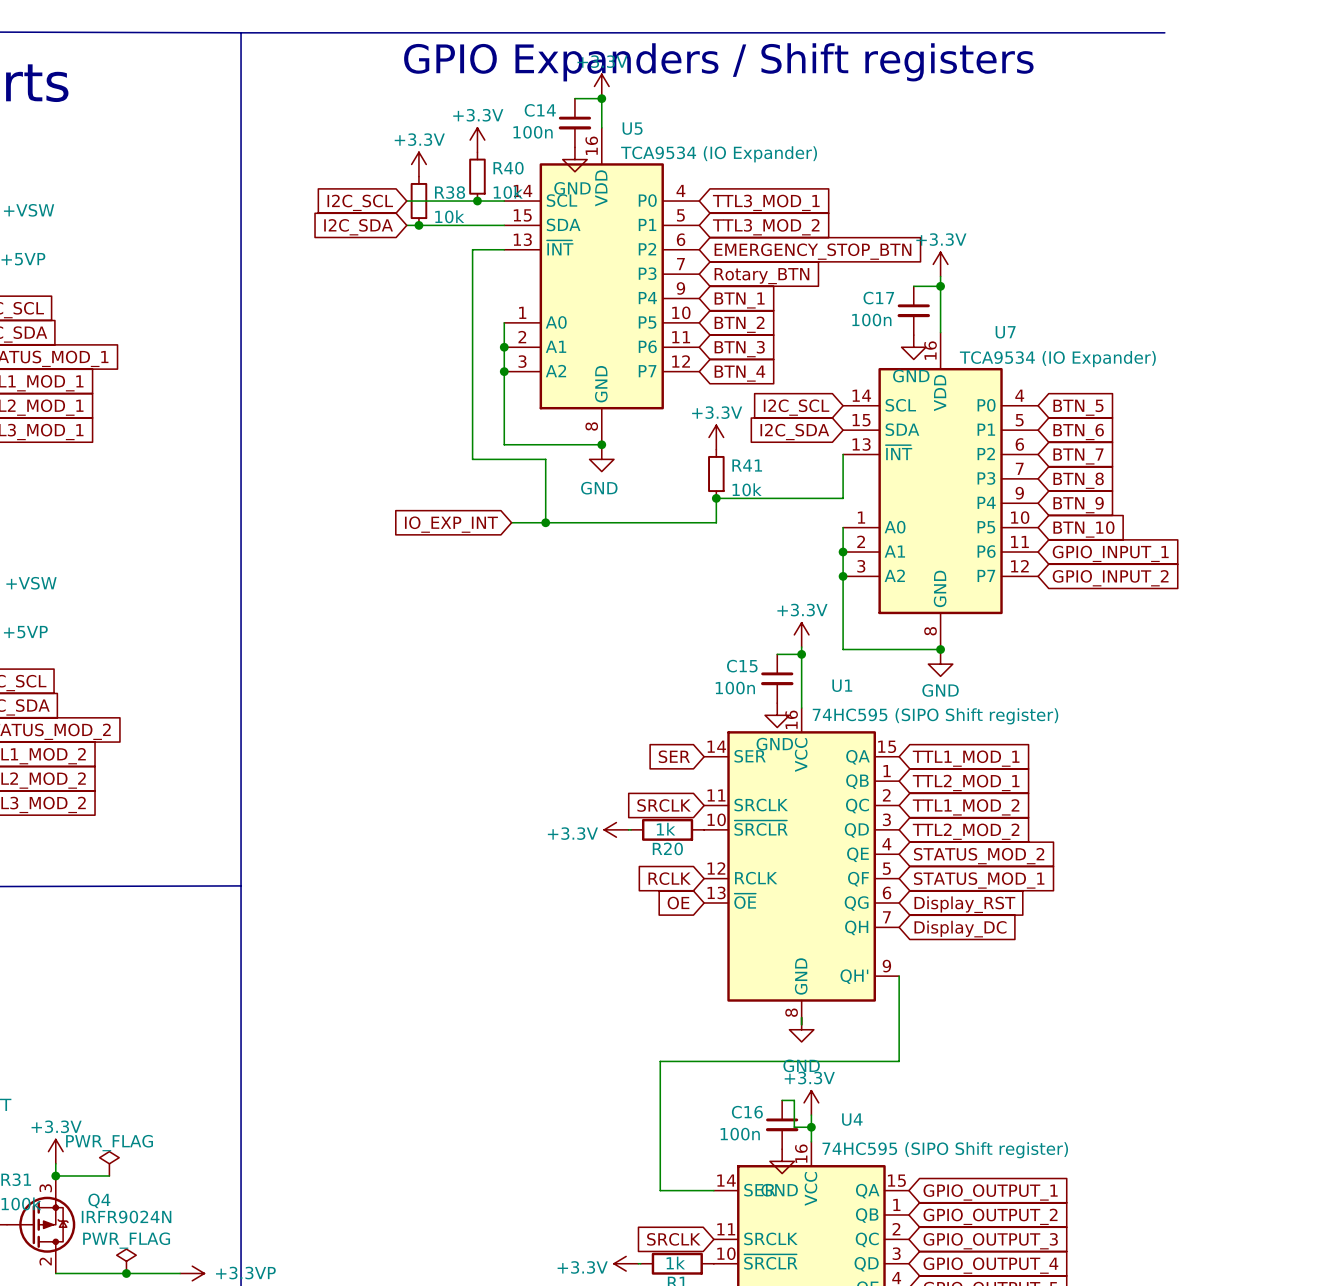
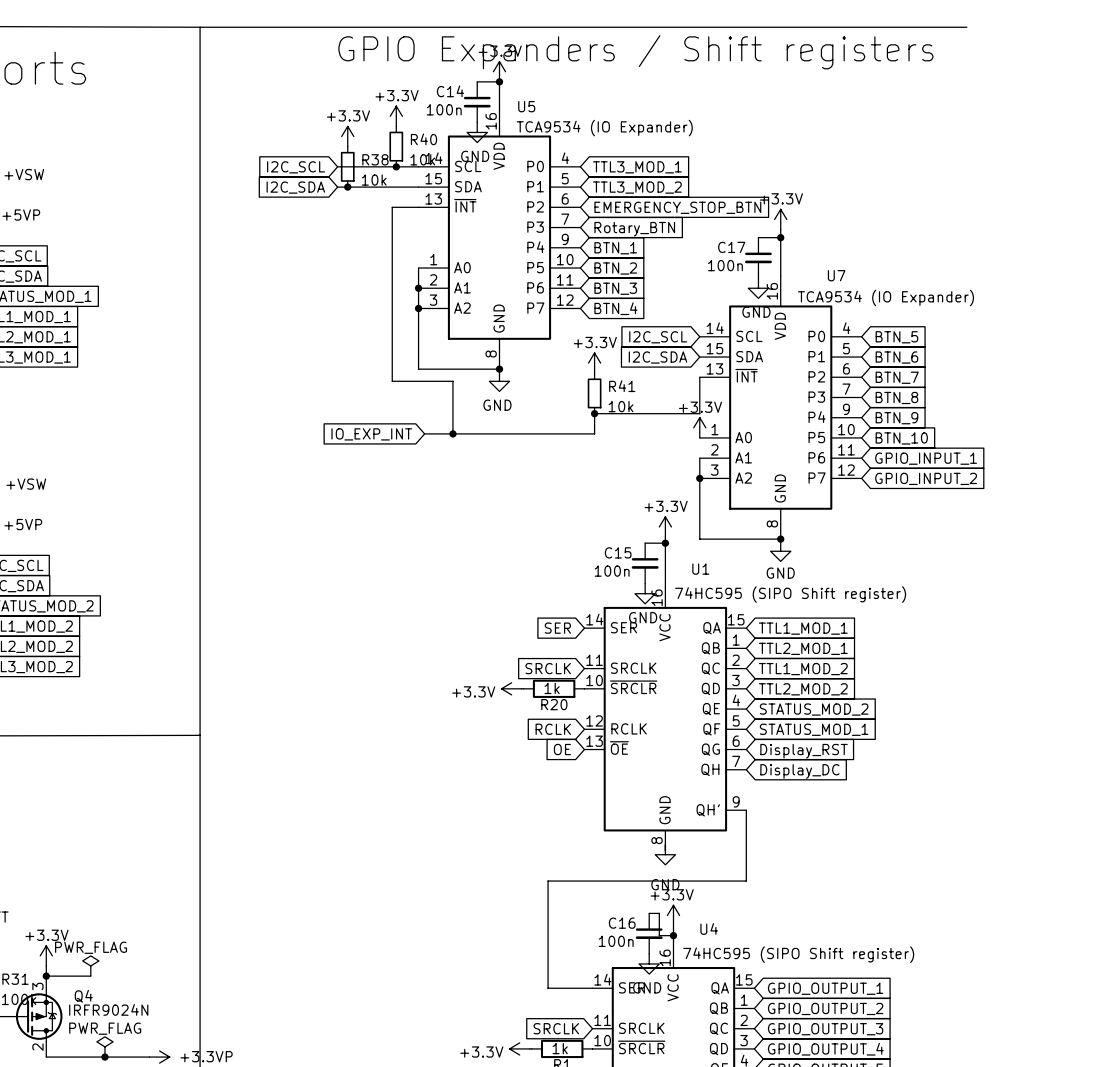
power symbol: none -> +3.3V (699, 427)
wire: (843, 527) (843, 552) -> none
junction: (843, 552) -> none

